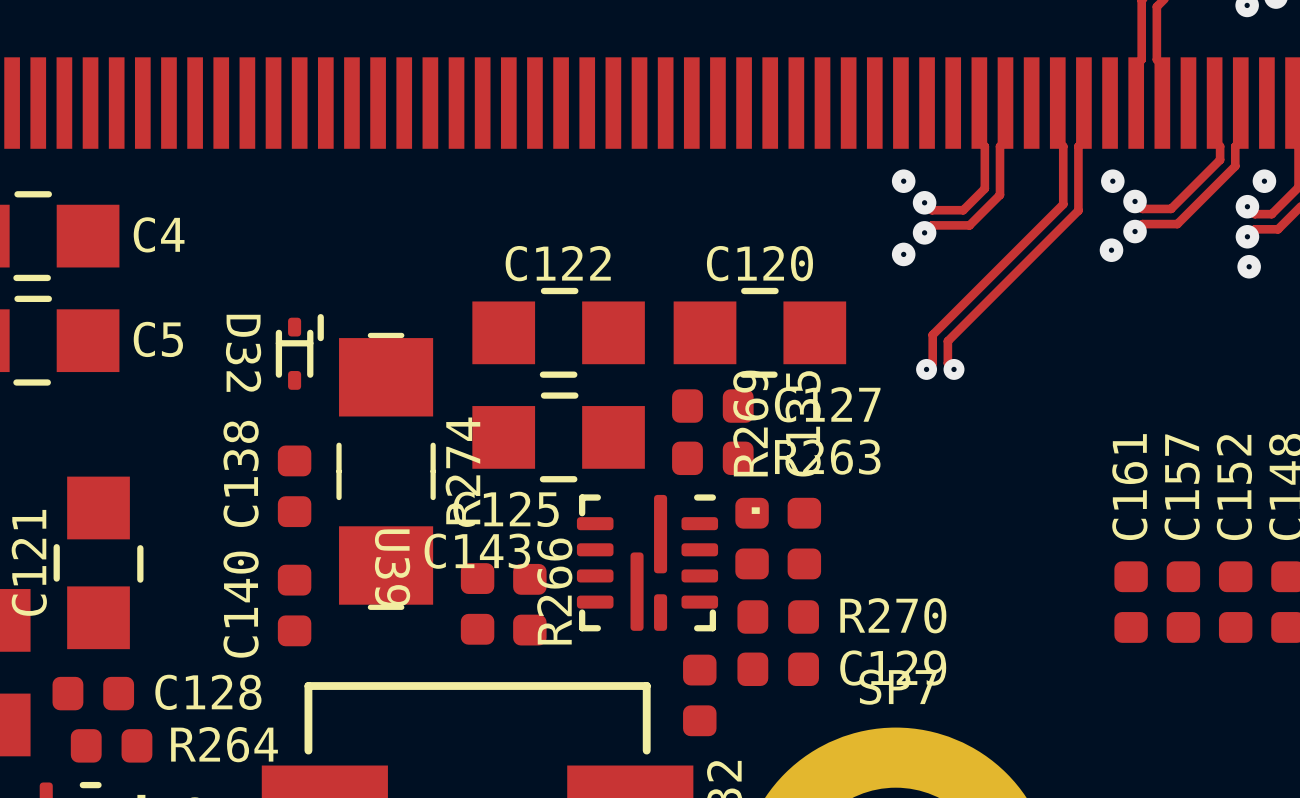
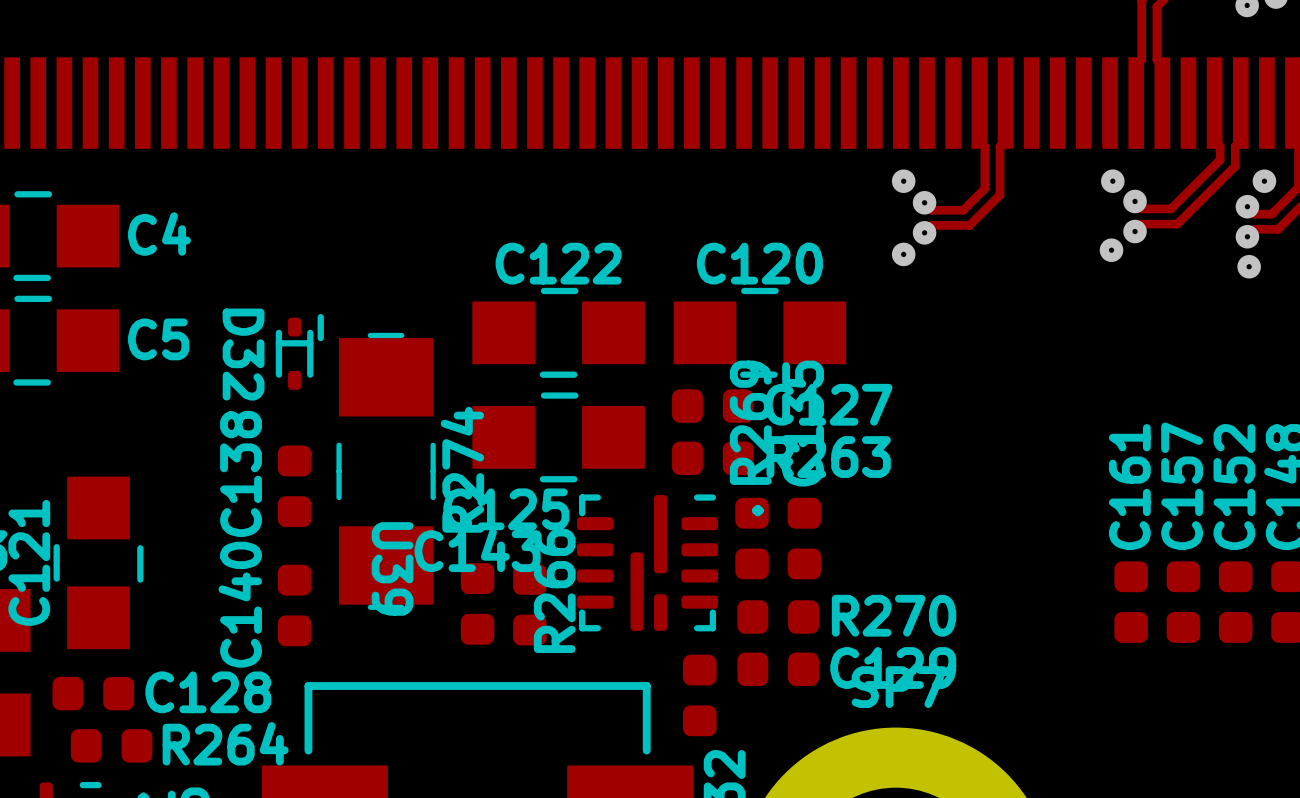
track: (1057, 103) (1057, 140) (1063, 146) (1063, 204) (932, 334) (932, 363) (926, 369) -> none
track: (1083, 103) (1083, 140) (1078, 146) (1078, 210) (947, 341) (947, 363) (954, 369) -> none
via: (926, 369) -> none
via: (954, 369) -> none

